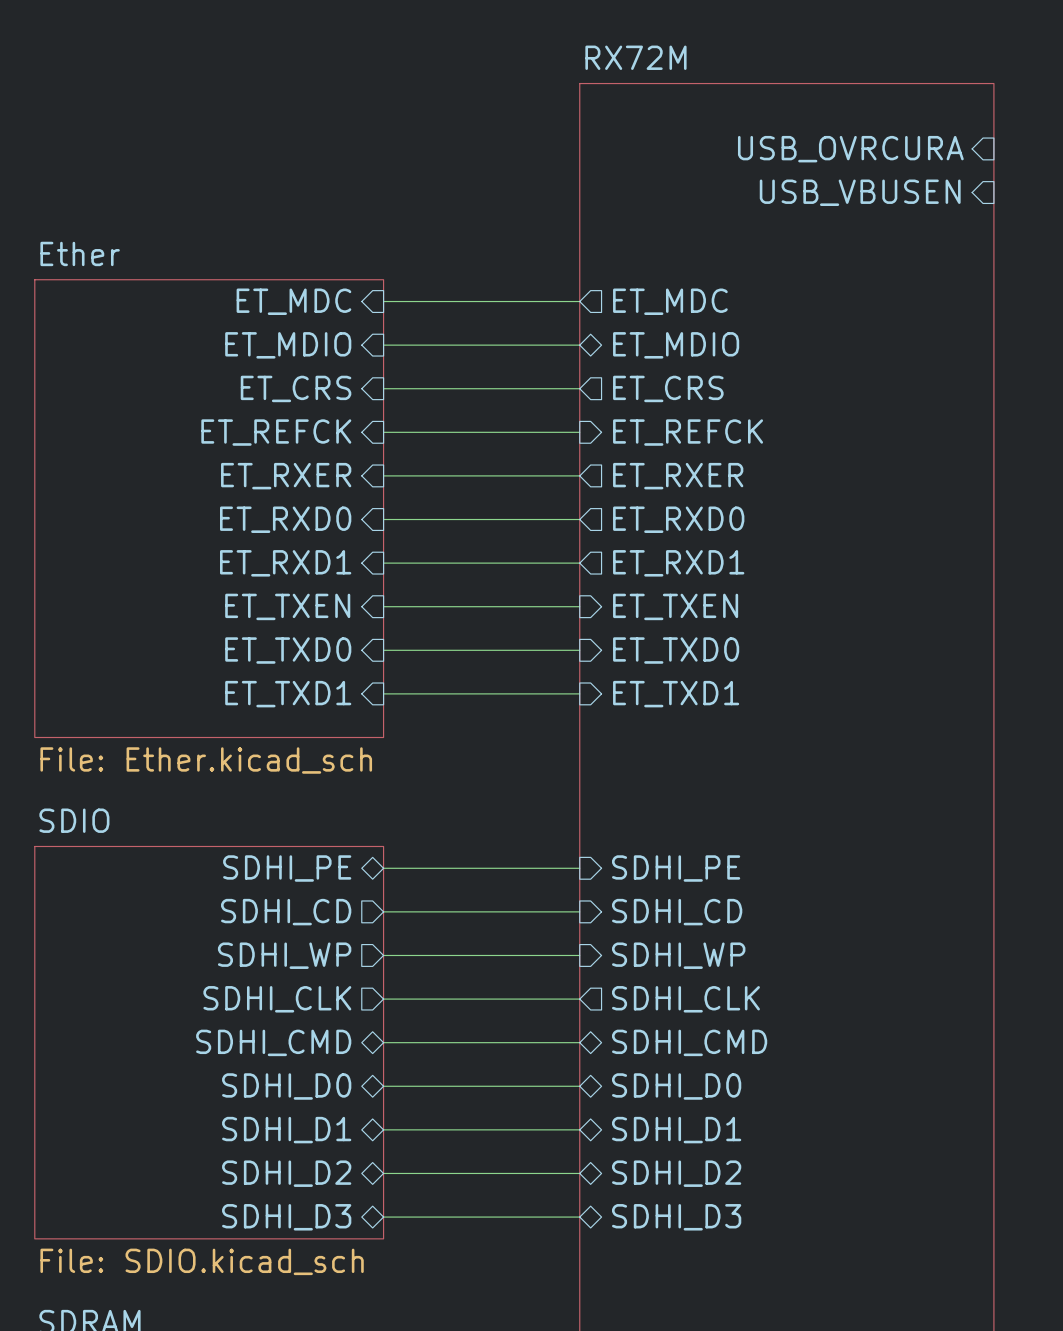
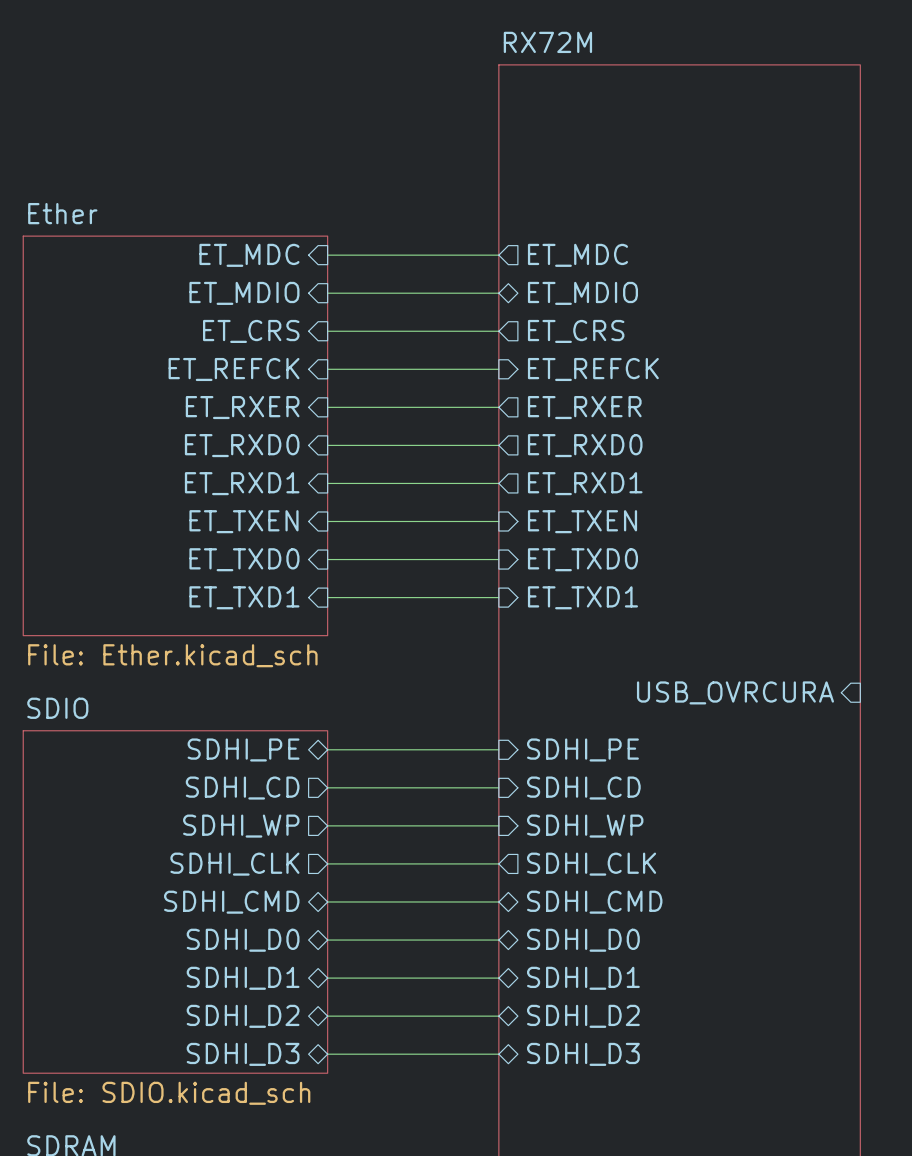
sheet pin: USB_OVRCURA (850, 149) -> none
sheet pin: USB_VBUSEN (860, 192) -> none
sheet pin: none -> USB_OVRCURA (735, 692)

